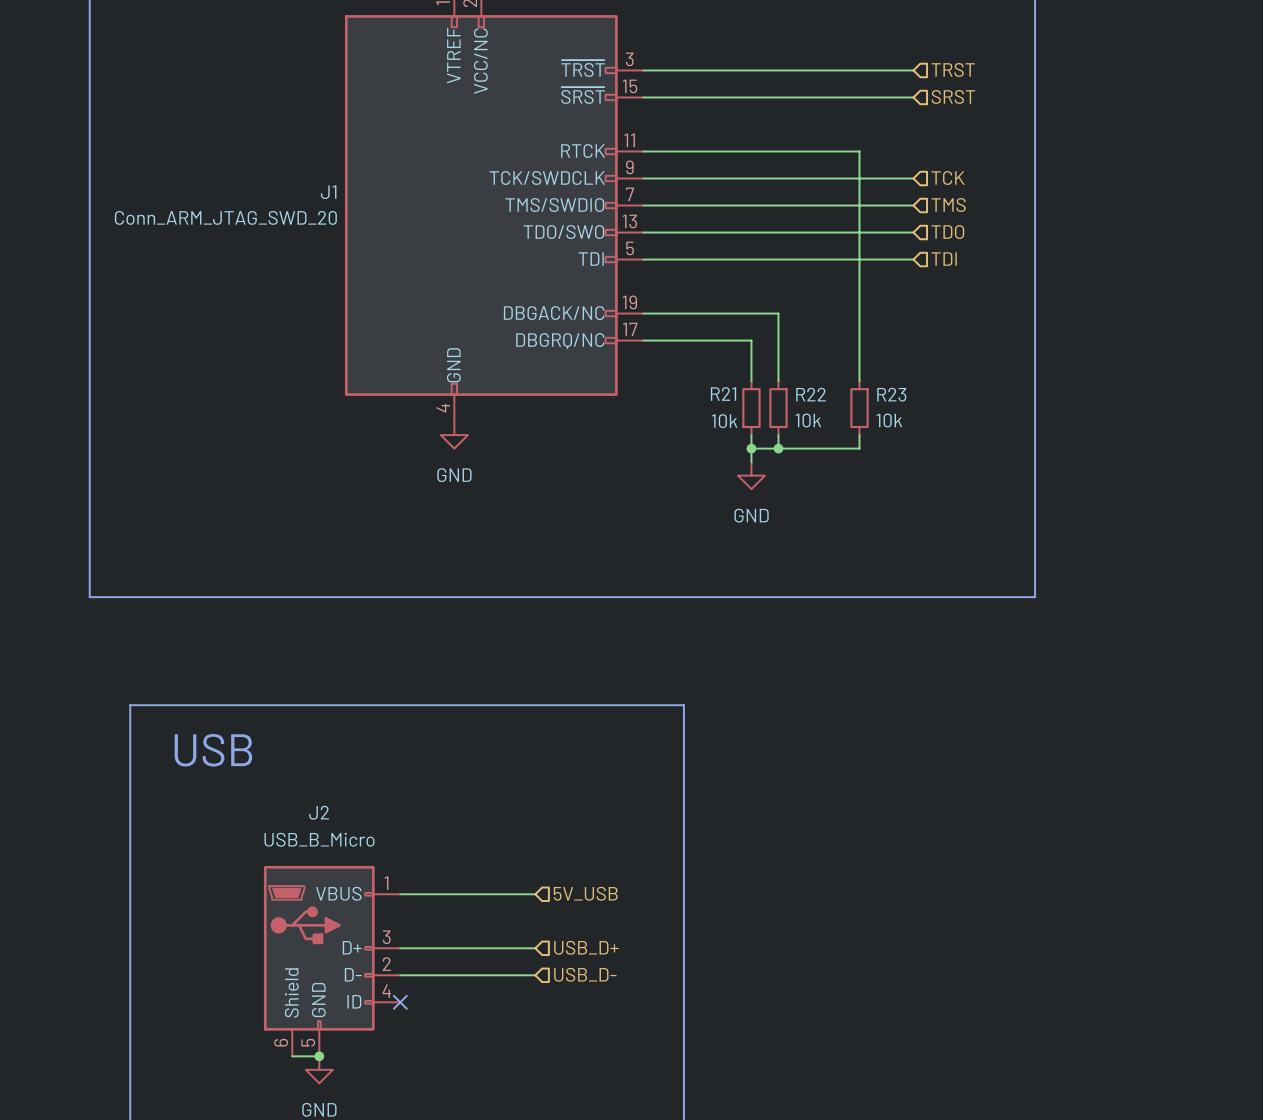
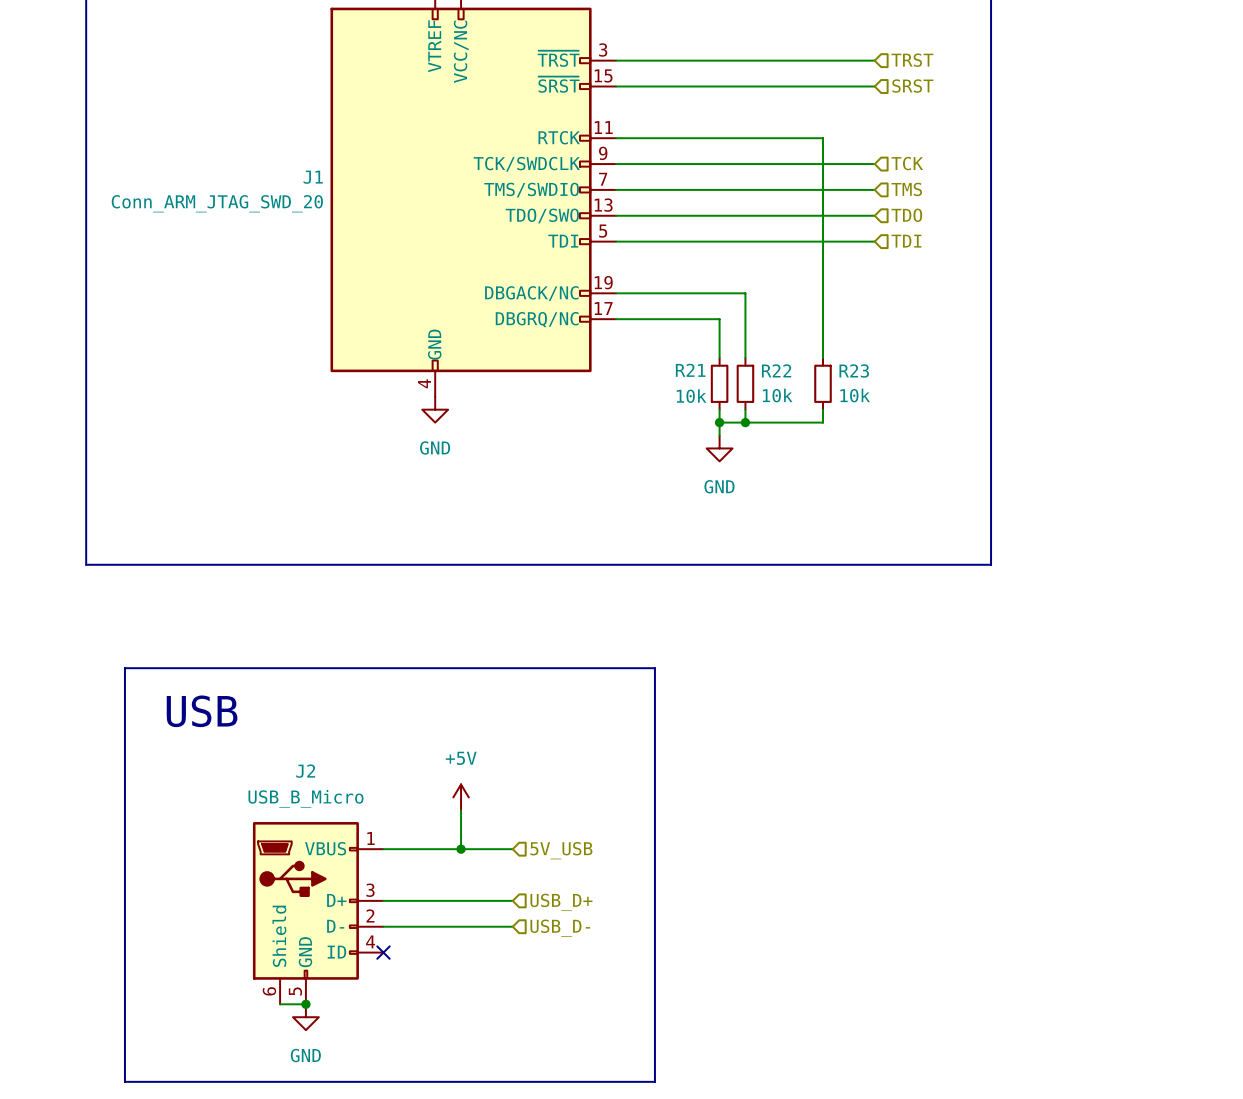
power symbol: none -> +5V (461, 797)
wire: none -> (461, 810) (461, 849)
junction: none -> (461, 849)

